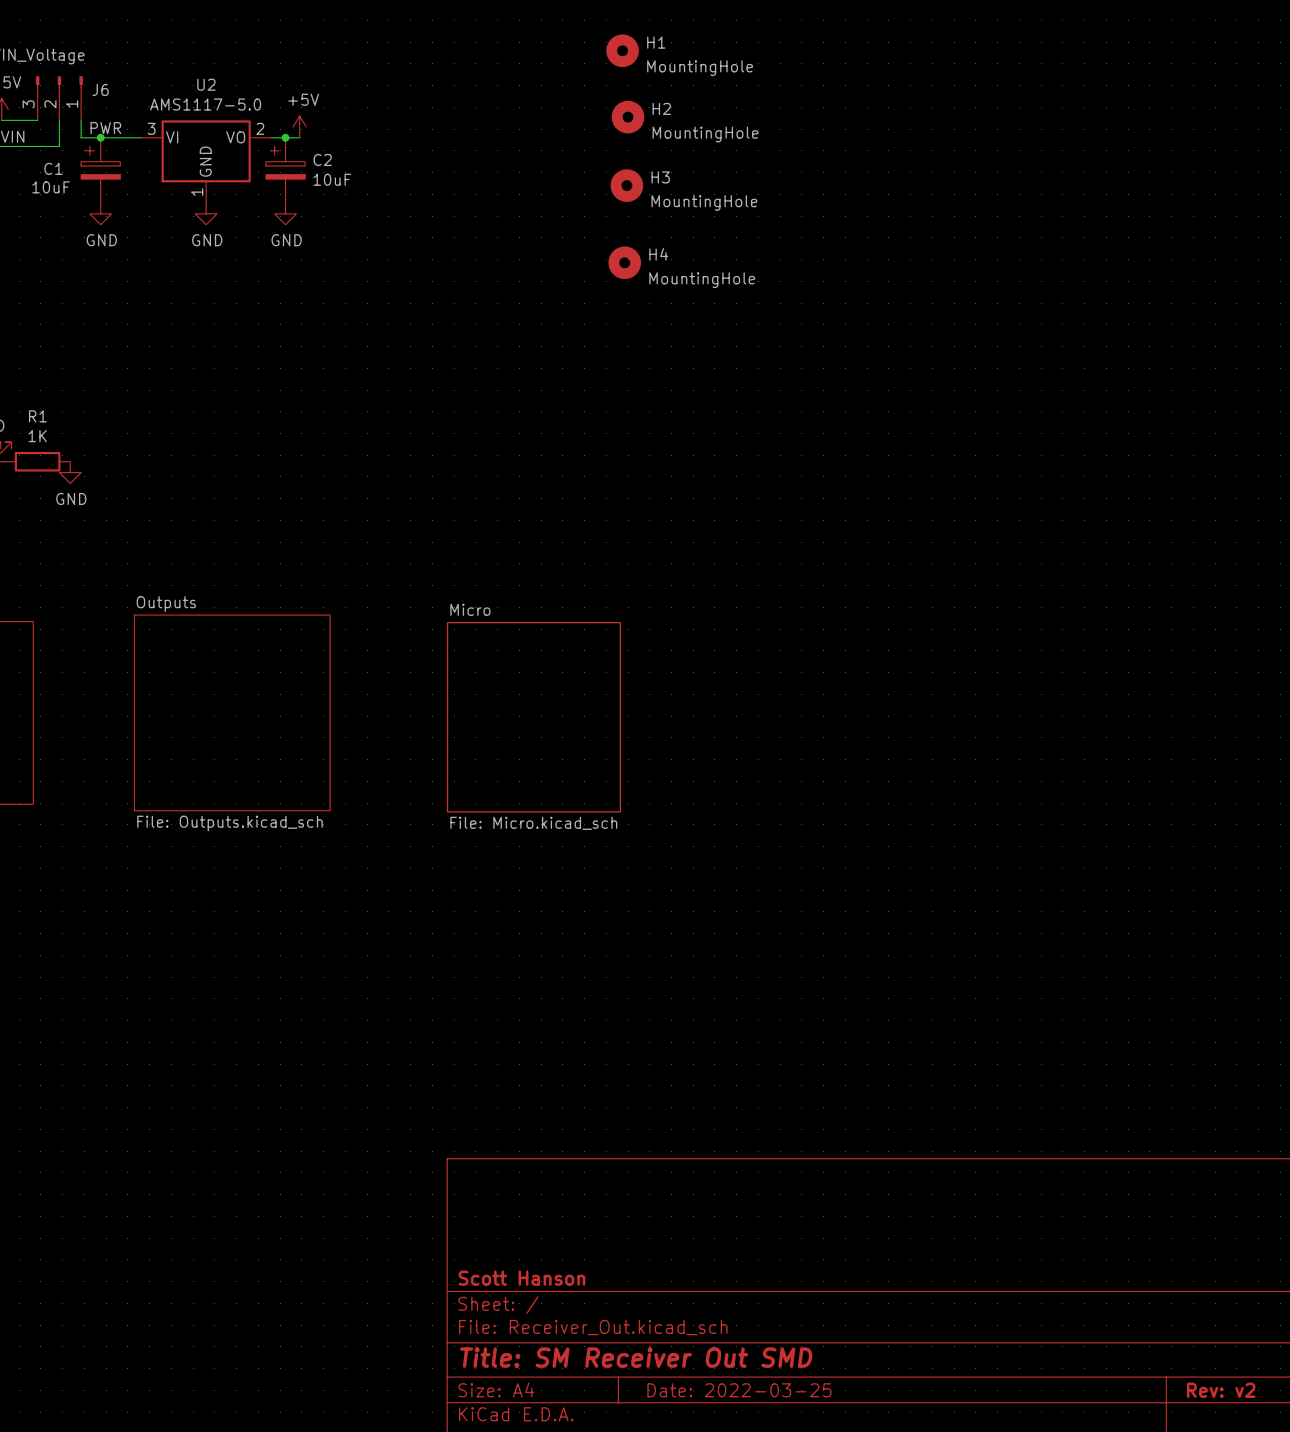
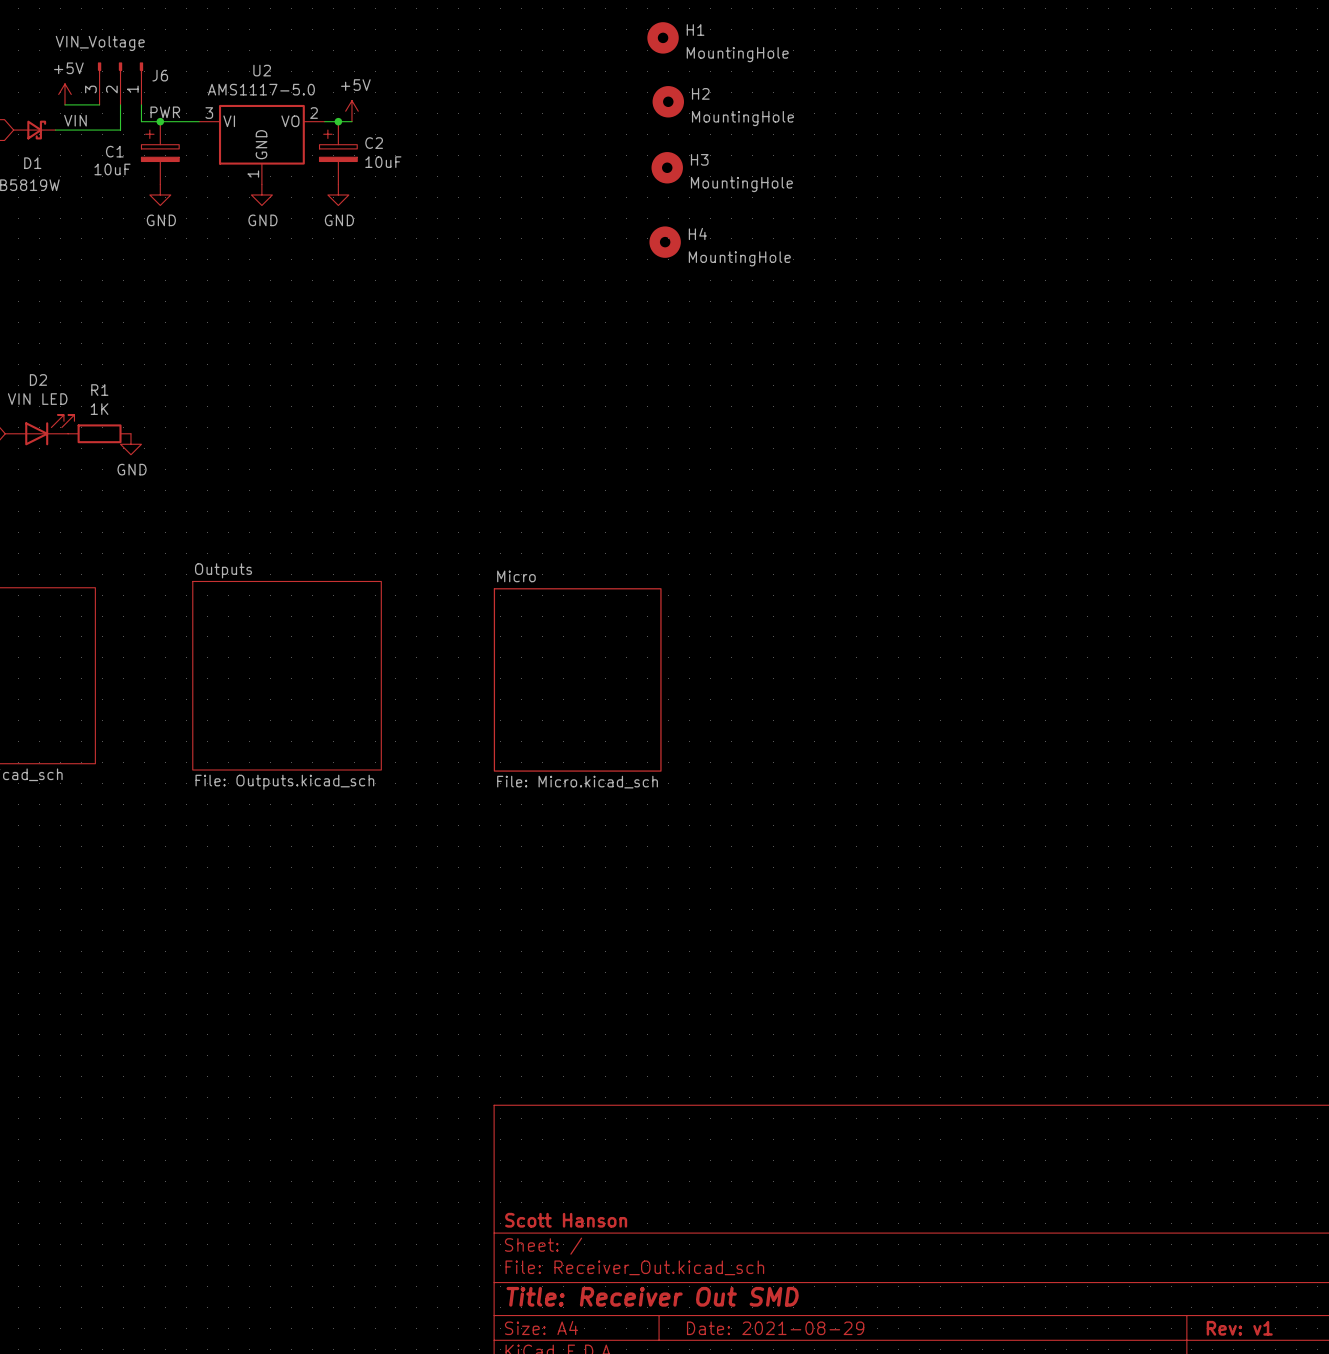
title block: Title: SM Receiver Out SMD (636, 1357) -> Title: Receiver Out SMD (652, 1296)
title block: Date: 2022-03-25 (739, 1390) -> Date: 2021-08-29 (775, 1328)
title block: Rev: v2 (1221, 1390) -> Rev: v1 (1239, 1328)

